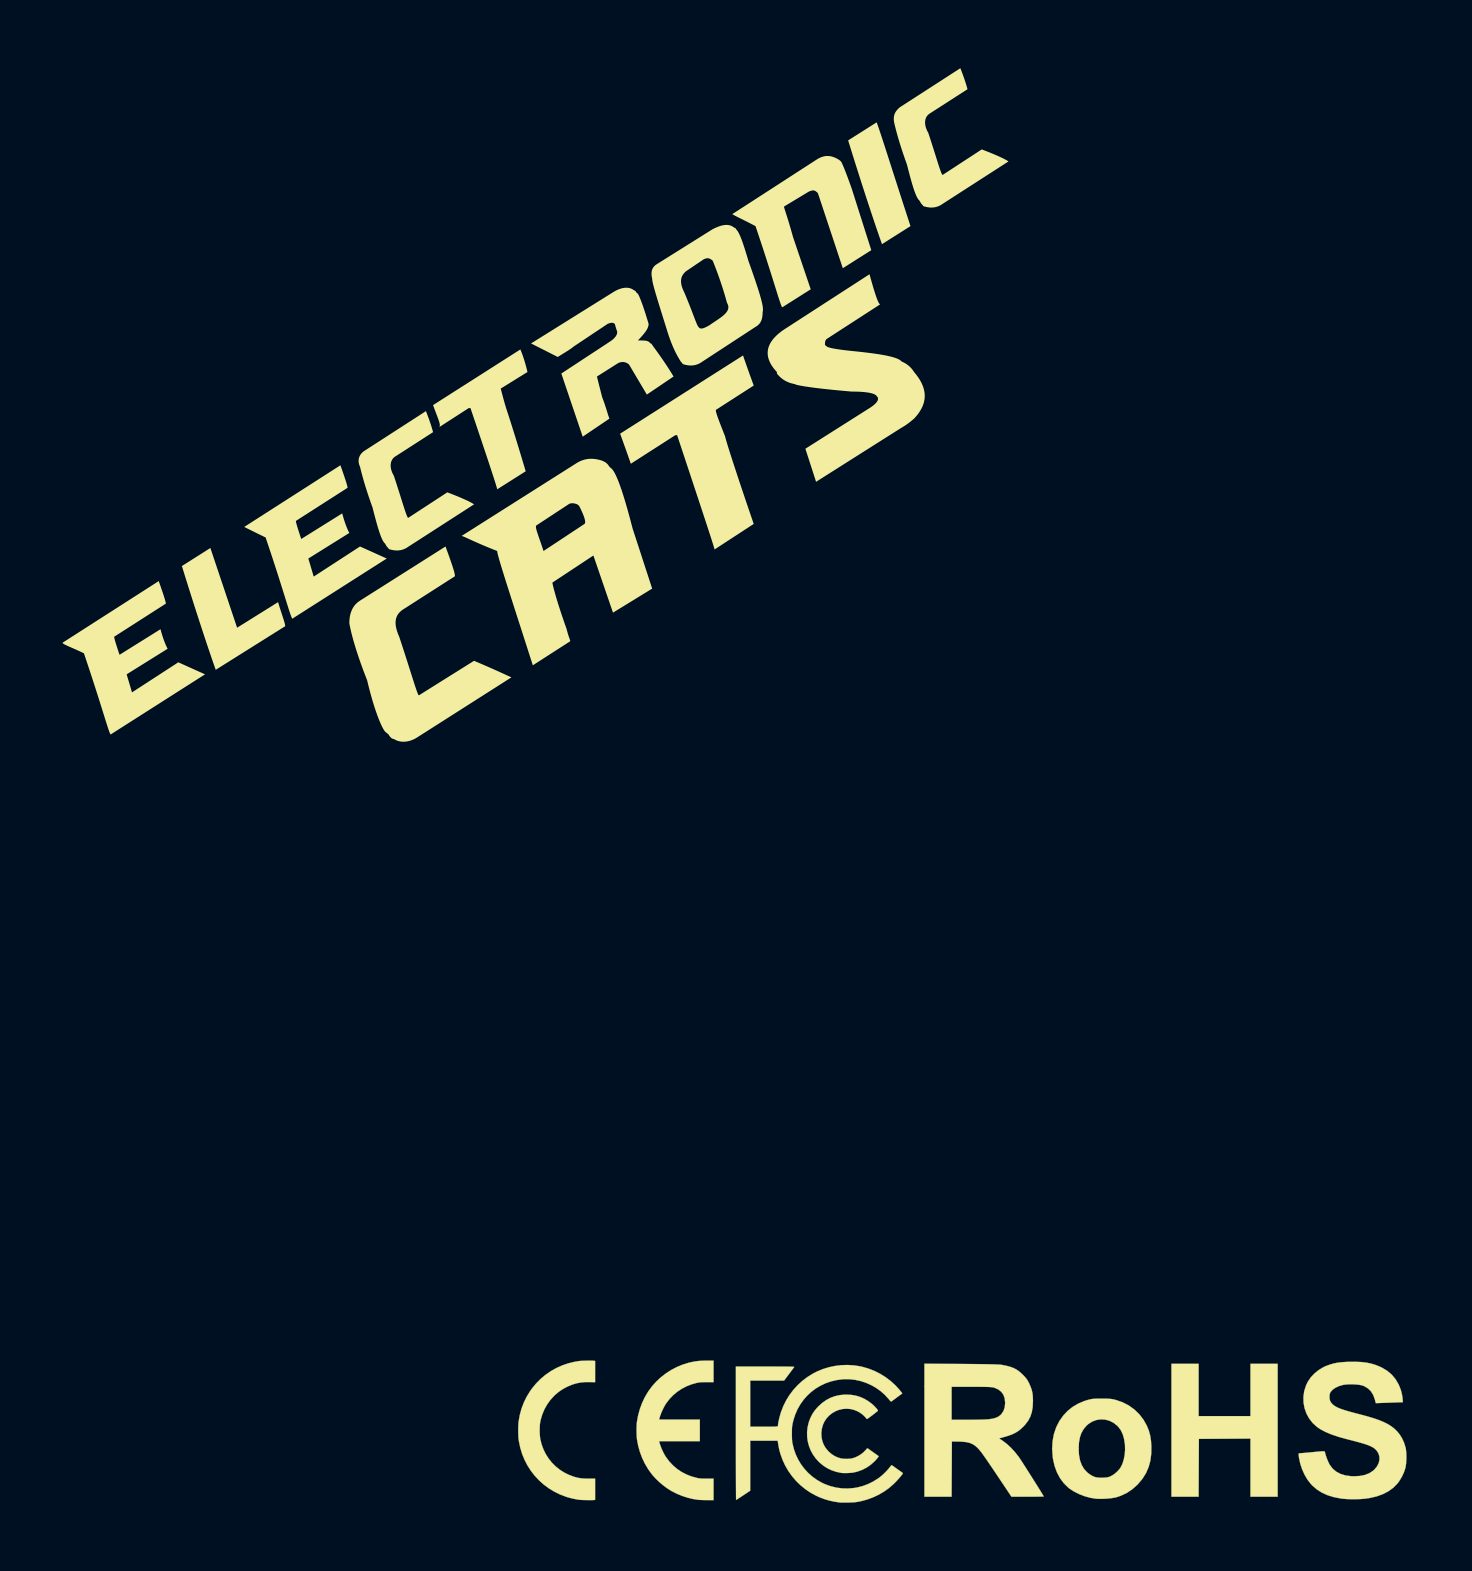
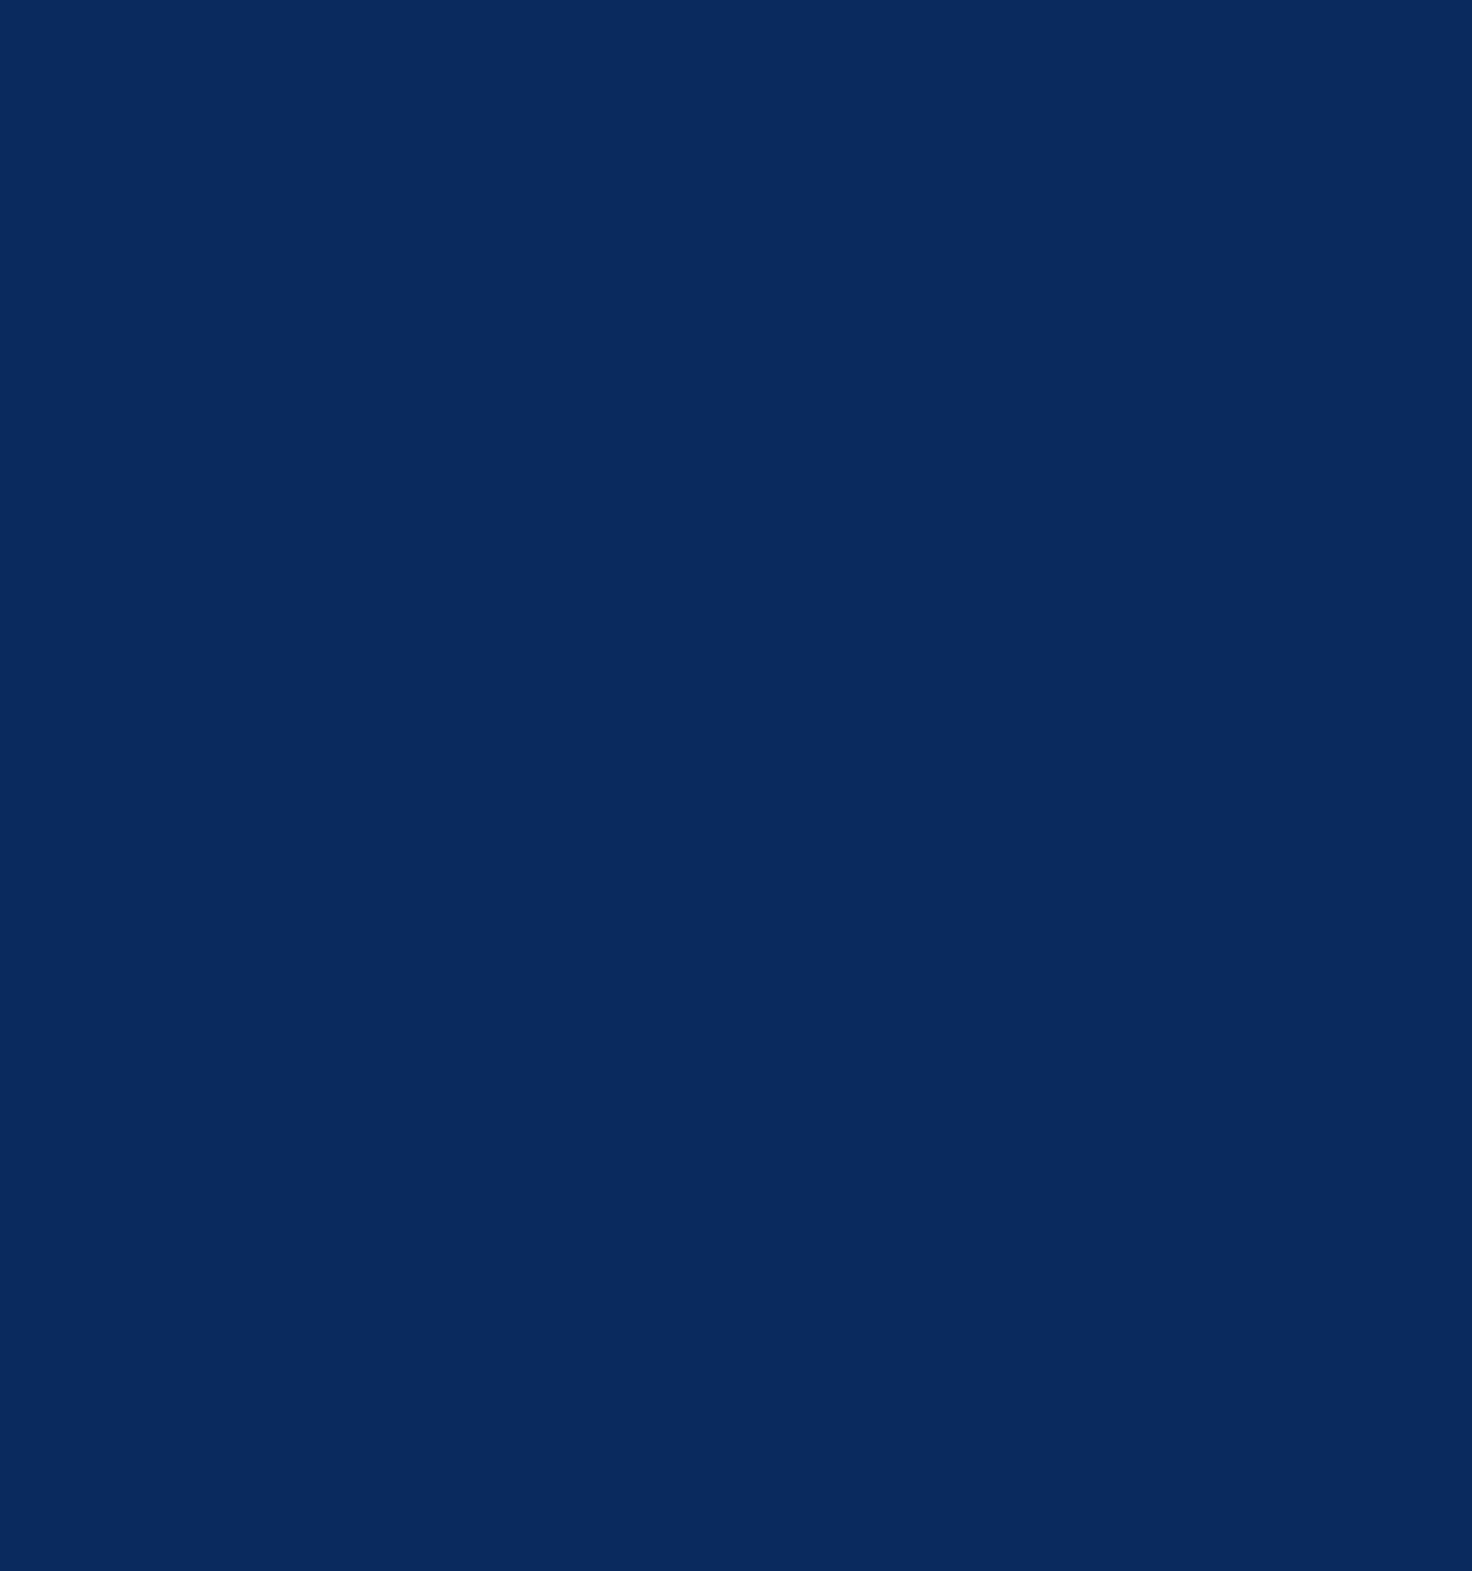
drawing: [62, 68, 1009, 742] -> none
drawing: [518, 1360, 1407, 1503] -> none

